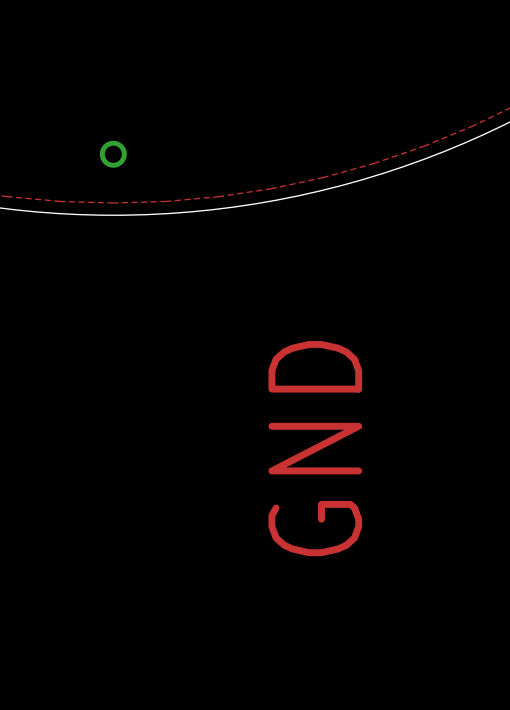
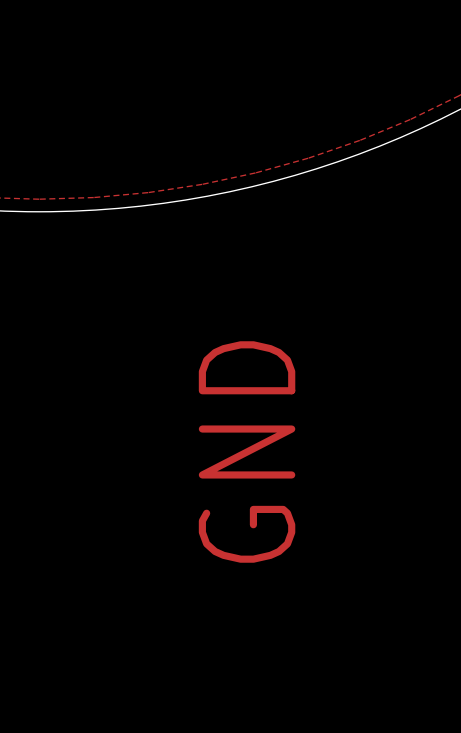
via: (113, 154) -> none

